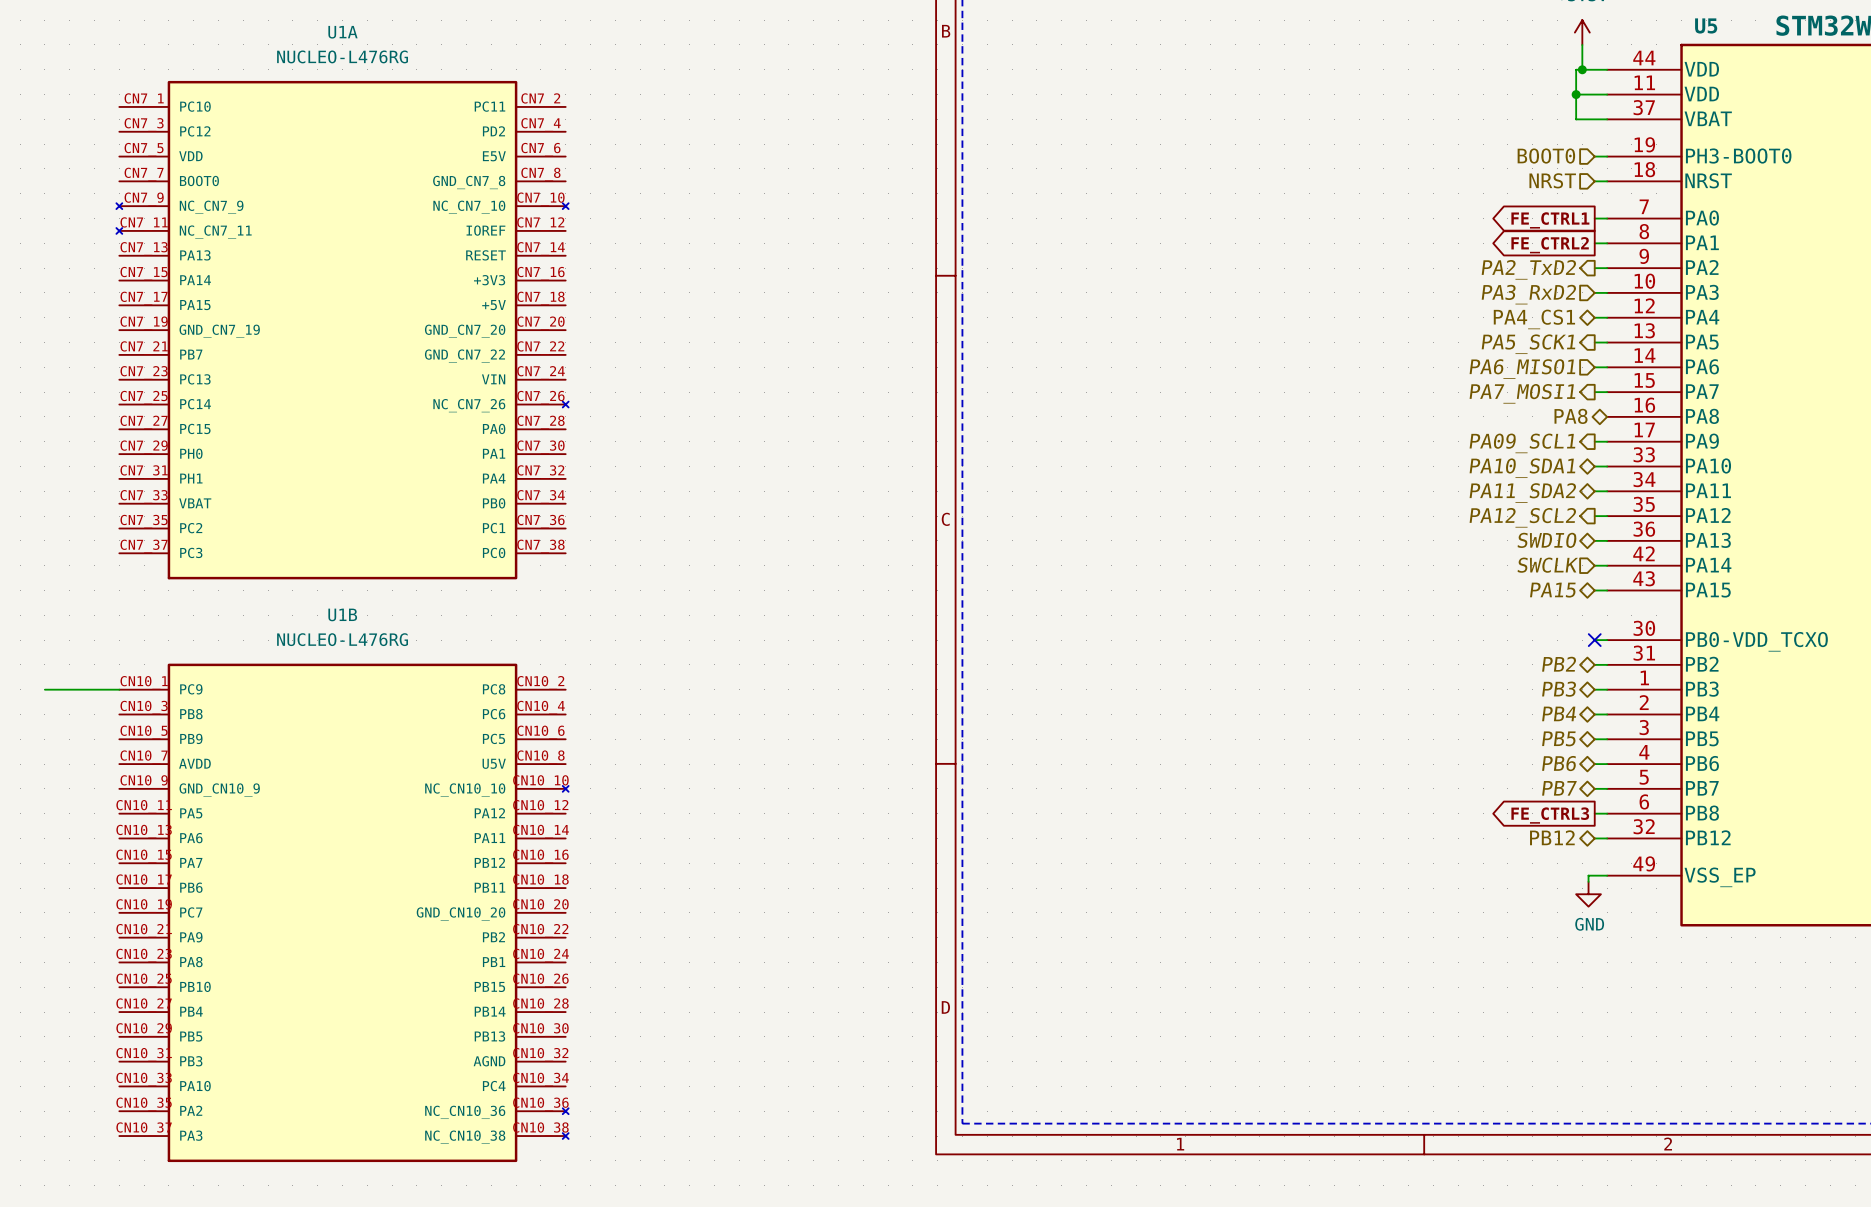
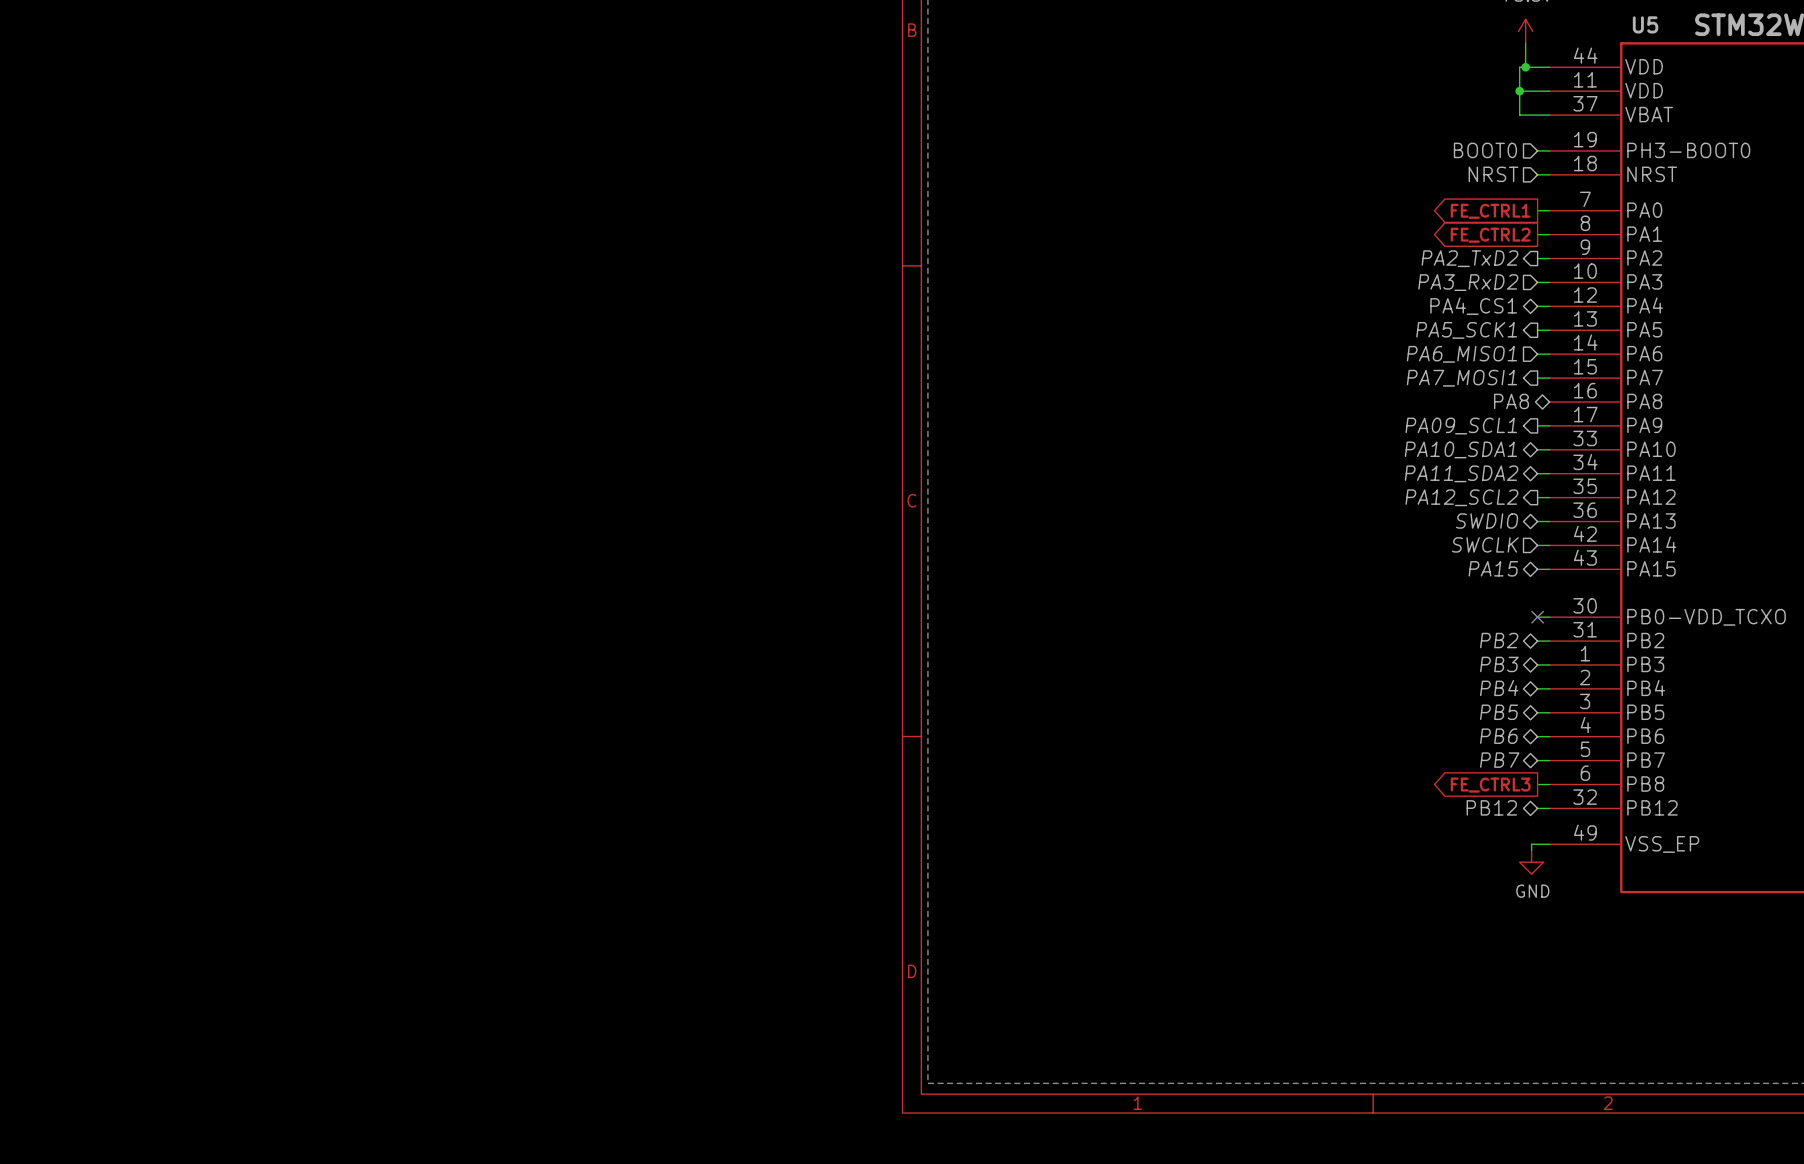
U1A: NUCLEO-L476RG (342, 330) -> none
wire: (44, 689) (119, 689) -> none
U1B: NUCLEO-L476RG (343, 912) -> none

